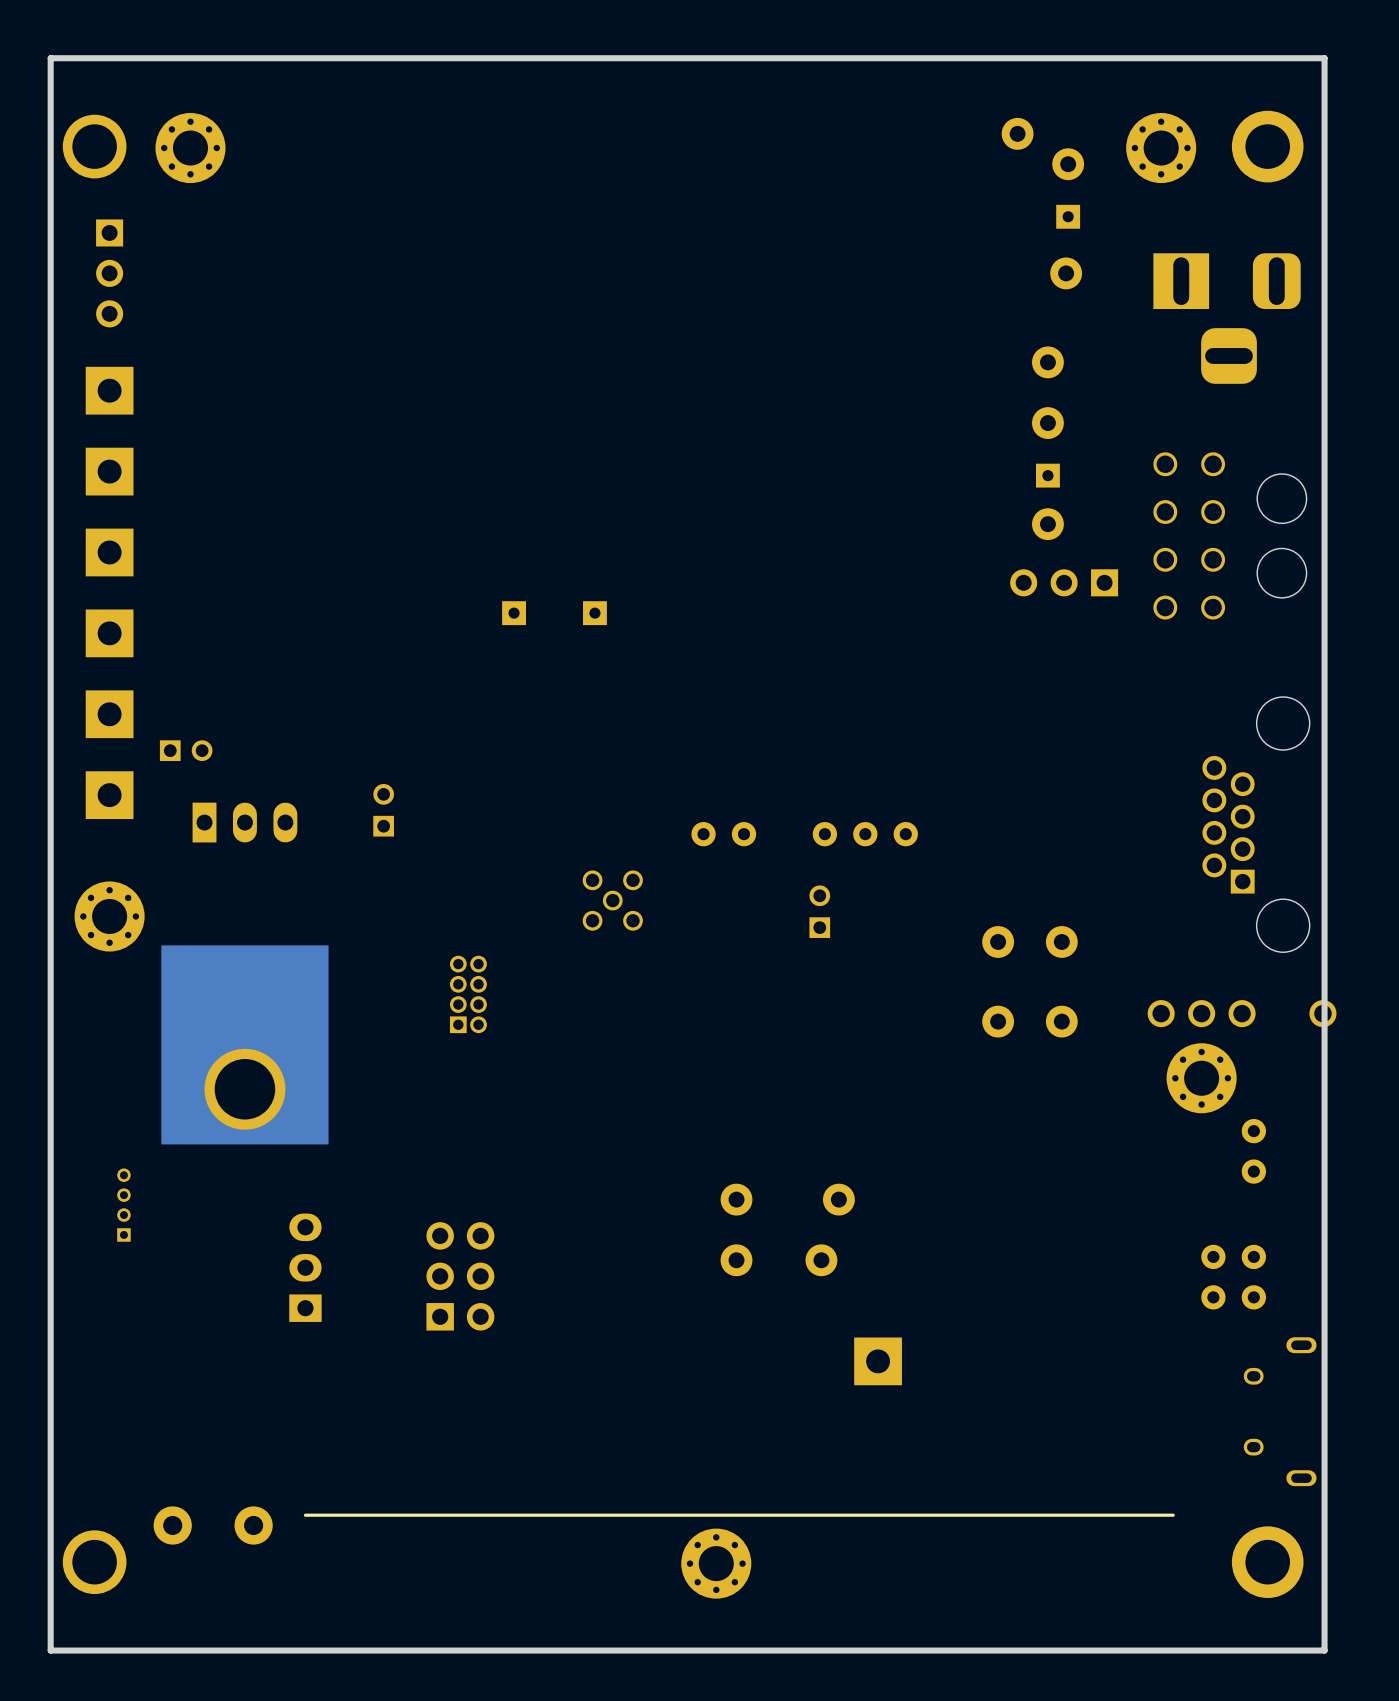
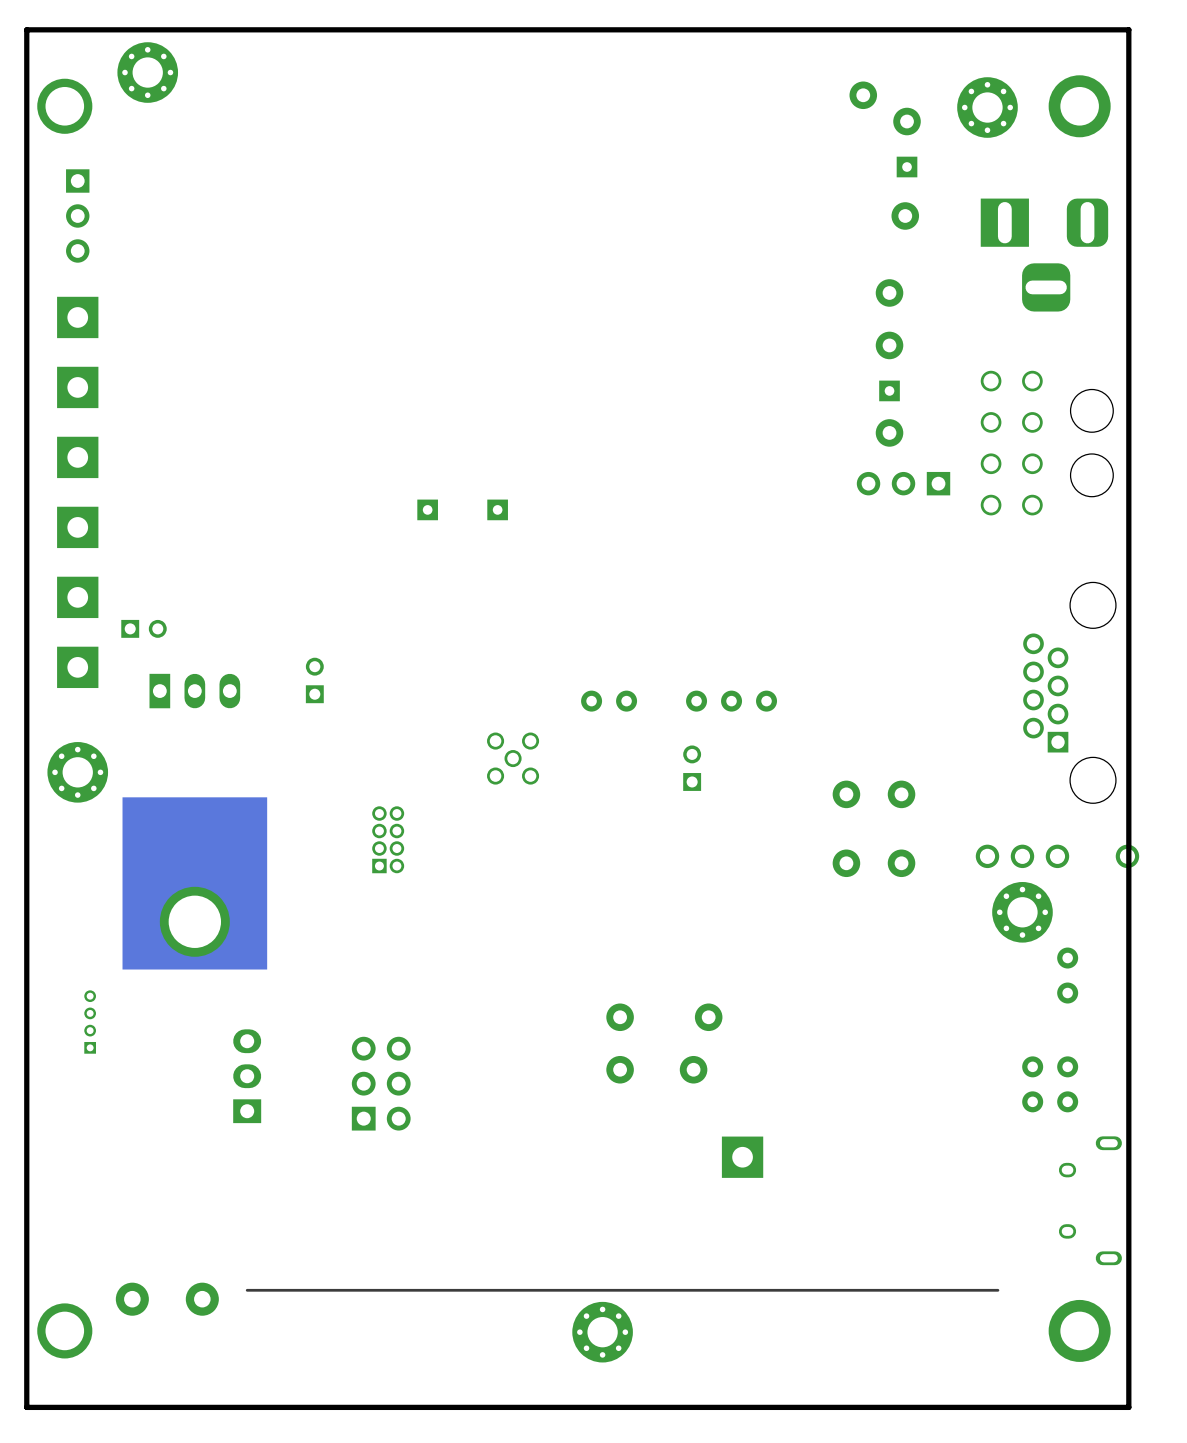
part position: (190, 148) -> (147, 72)

